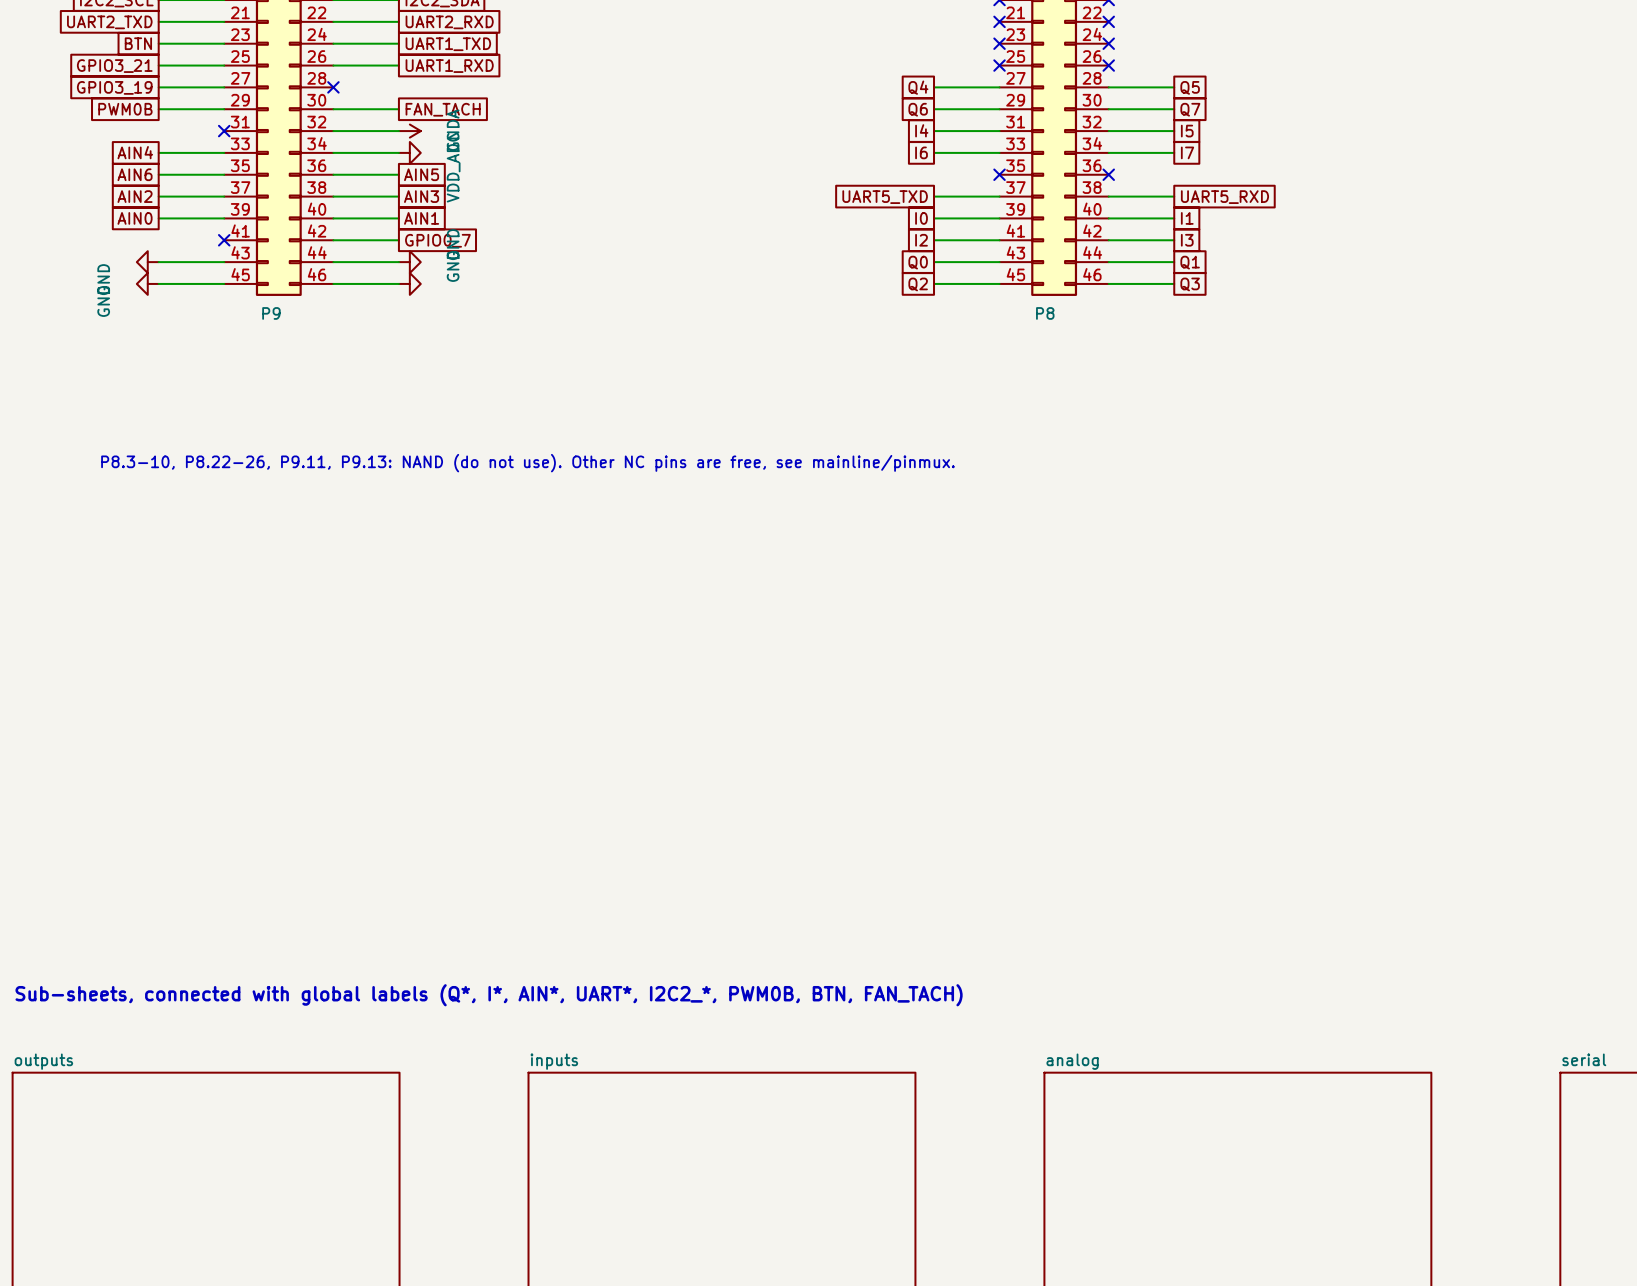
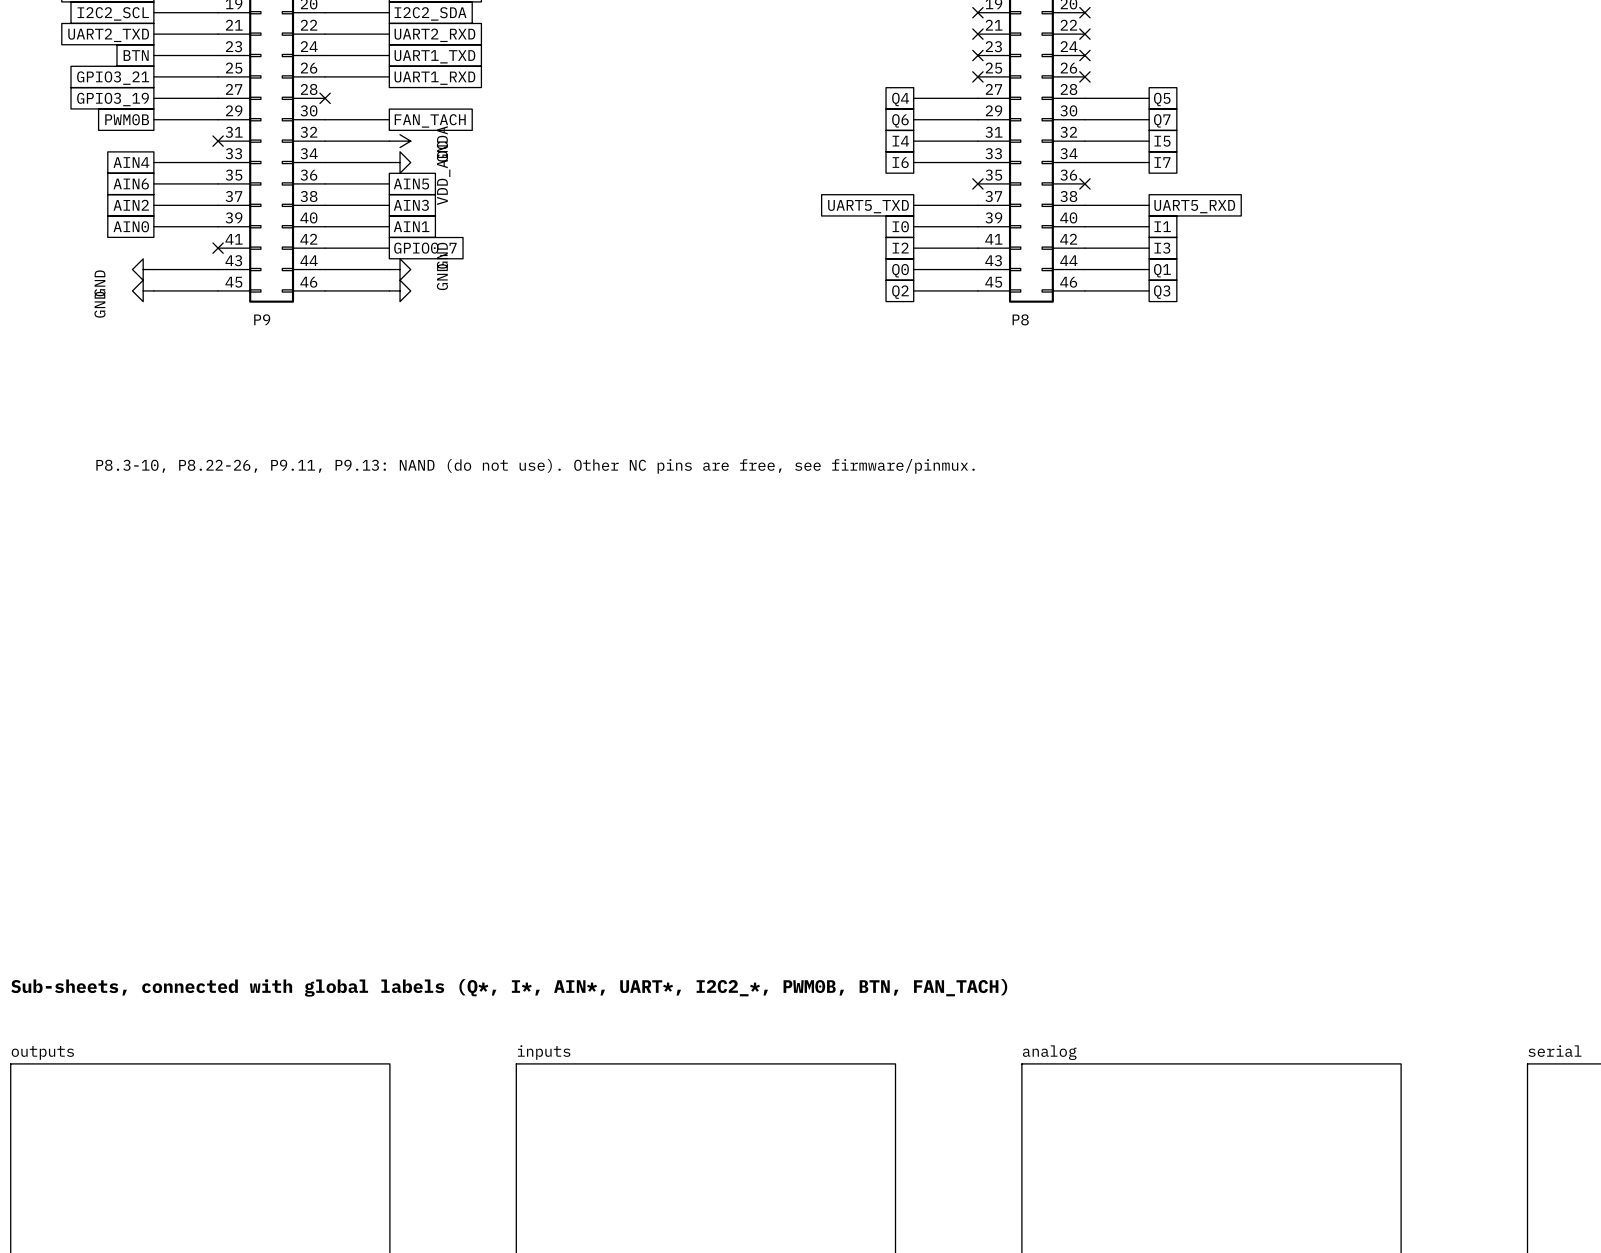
text: P8.3-10, P8.22-26, P9.11, P9.13: NAND (do not use). Other NC pins are free, see mainline/pinmux. (527, 463) -> P8.3-10, P8.22-26, P9.11, P9.13: NAND (do not use). Other NC pins are free, see firmware/pinmux. (535, 466)

